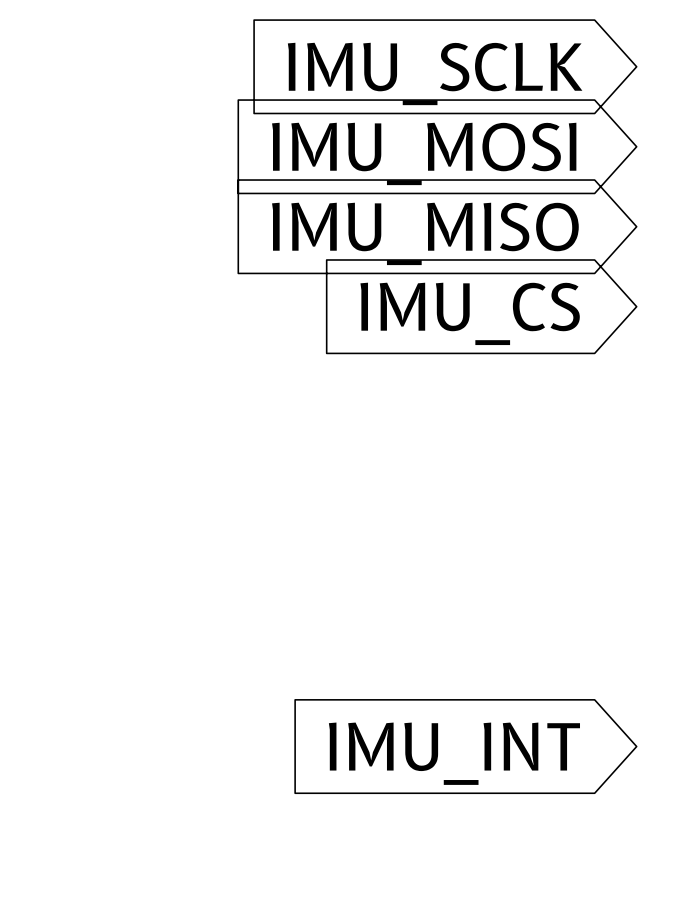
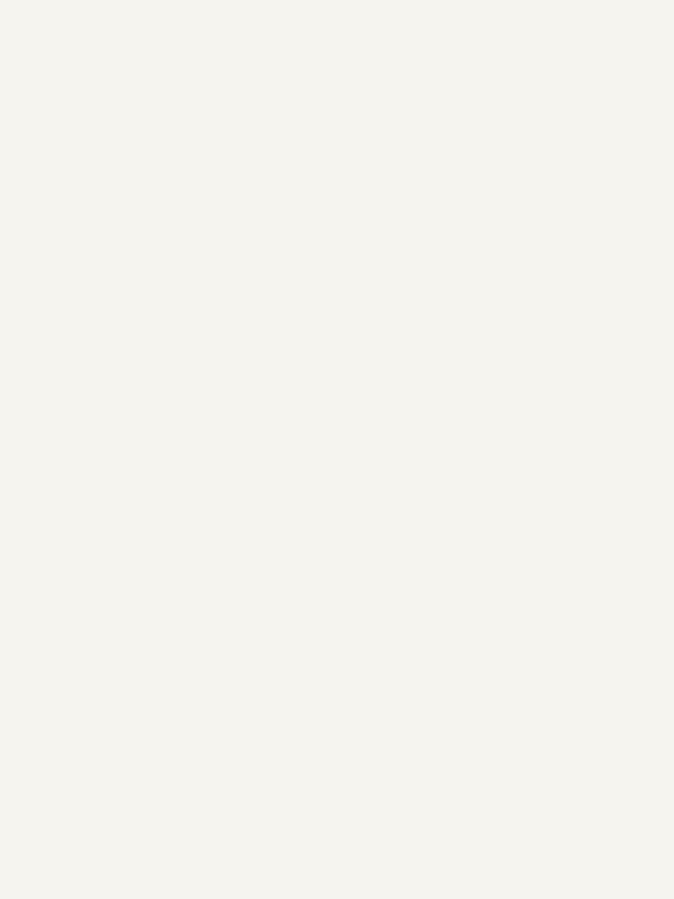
global label: IMU_SCLK (435, 73) -> none
global label: IMU_MOSI (424, 153) -> none
global label: IMU_MISO (425, 233) -> none
global label: IMU_CS (470, 313) -> none
global label: IMU_INT (454, 753) -> none

